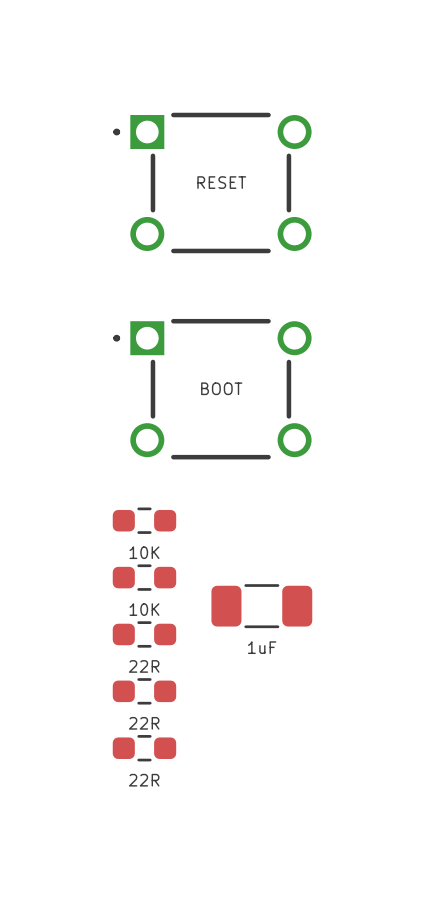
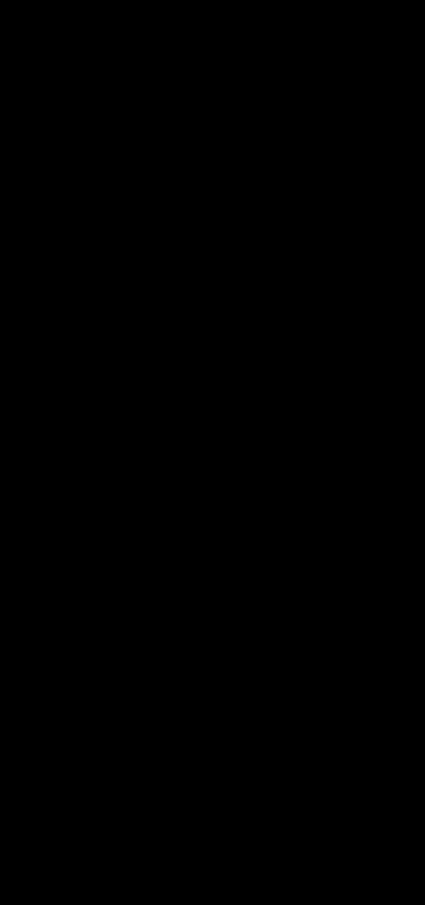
part: RESET (212, 182) -> none
part: BOOT (212, 389) -> none
part: 10K (144, 520) -> none
part: 10K (144, 577) -> none
part: 1uF (261, 606) -> none
part: 22R (144, 634) -> none
part: 22R (144, 691) -> none
part: 22R (144, 748) -> none

